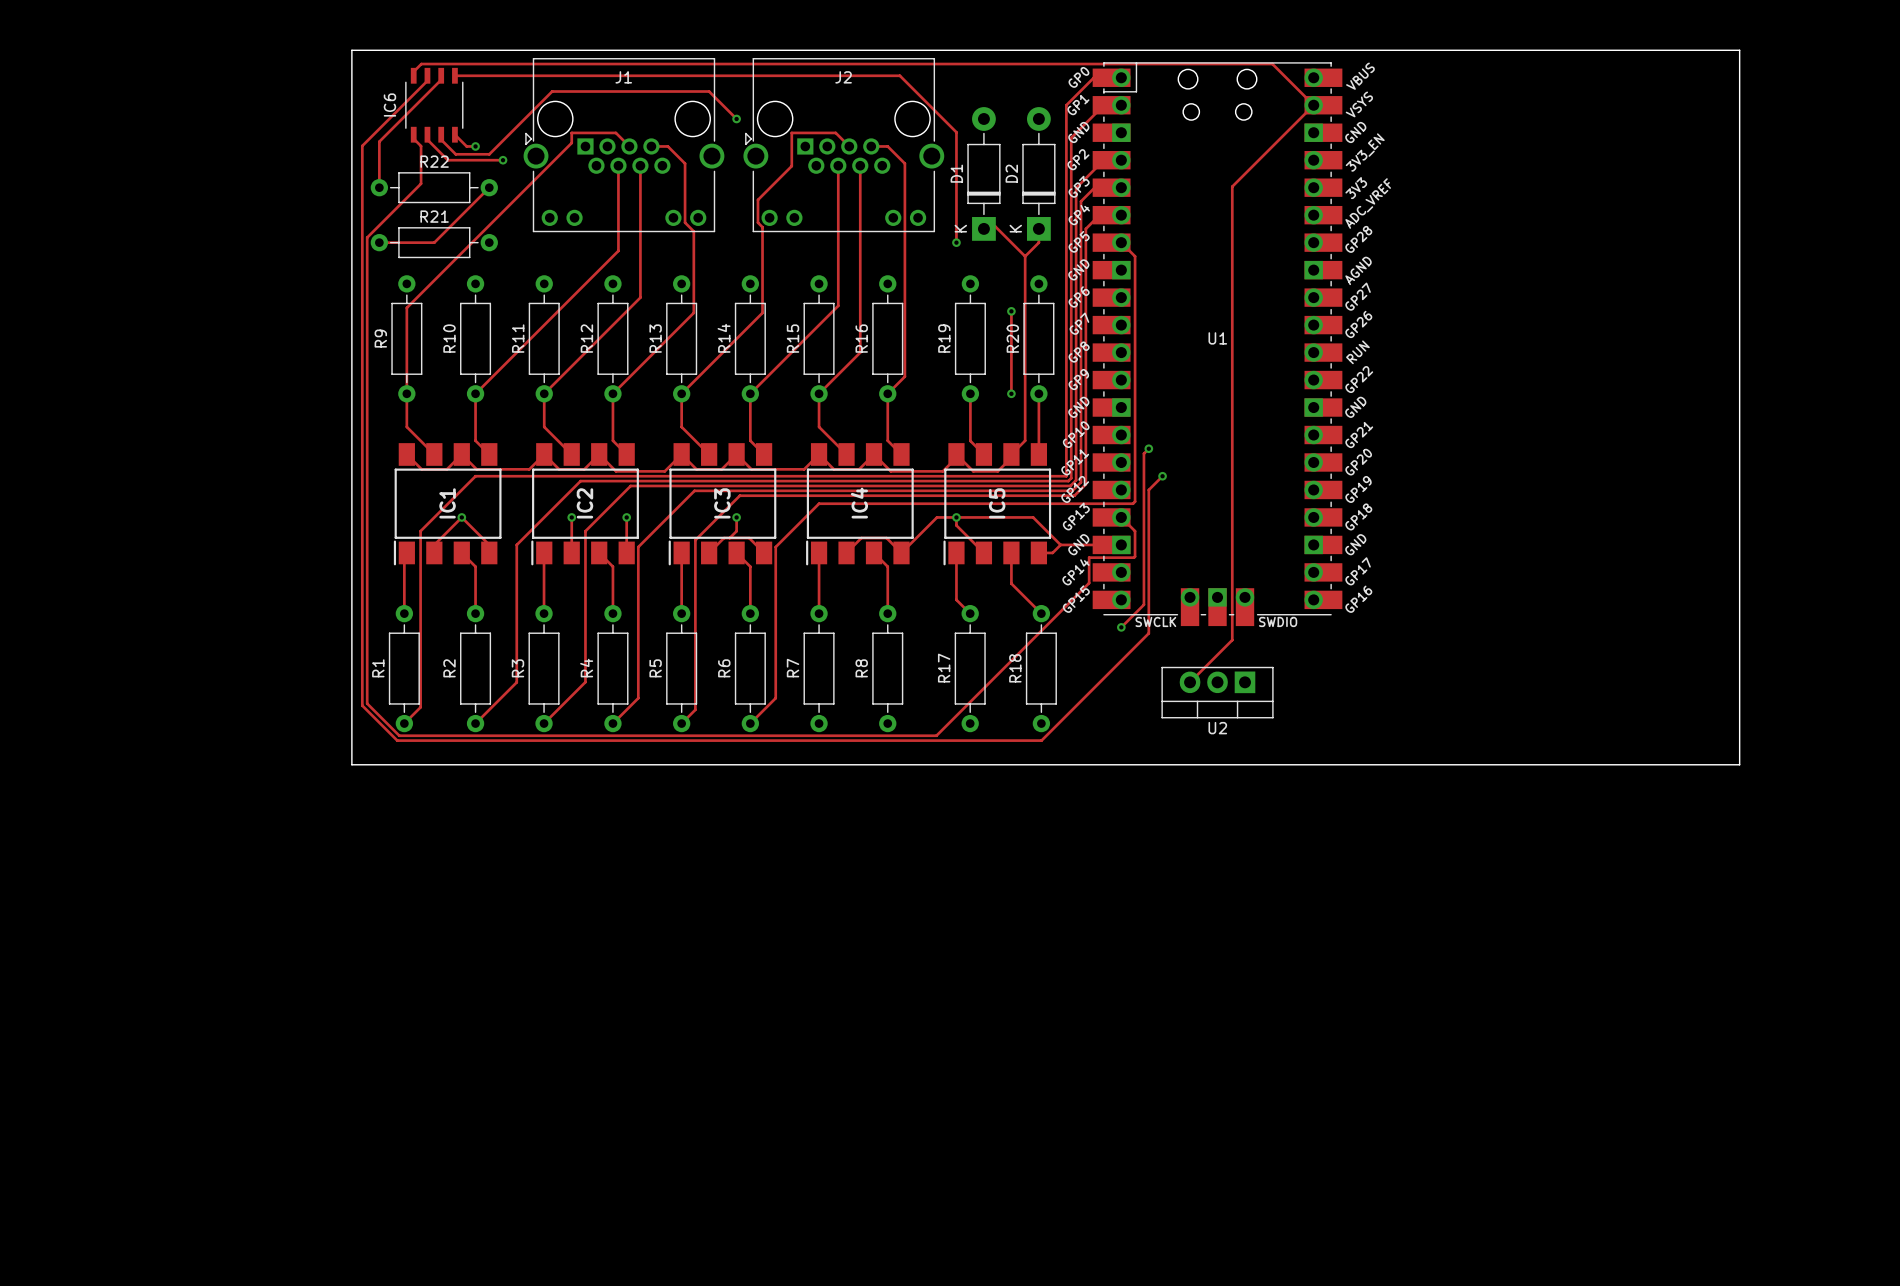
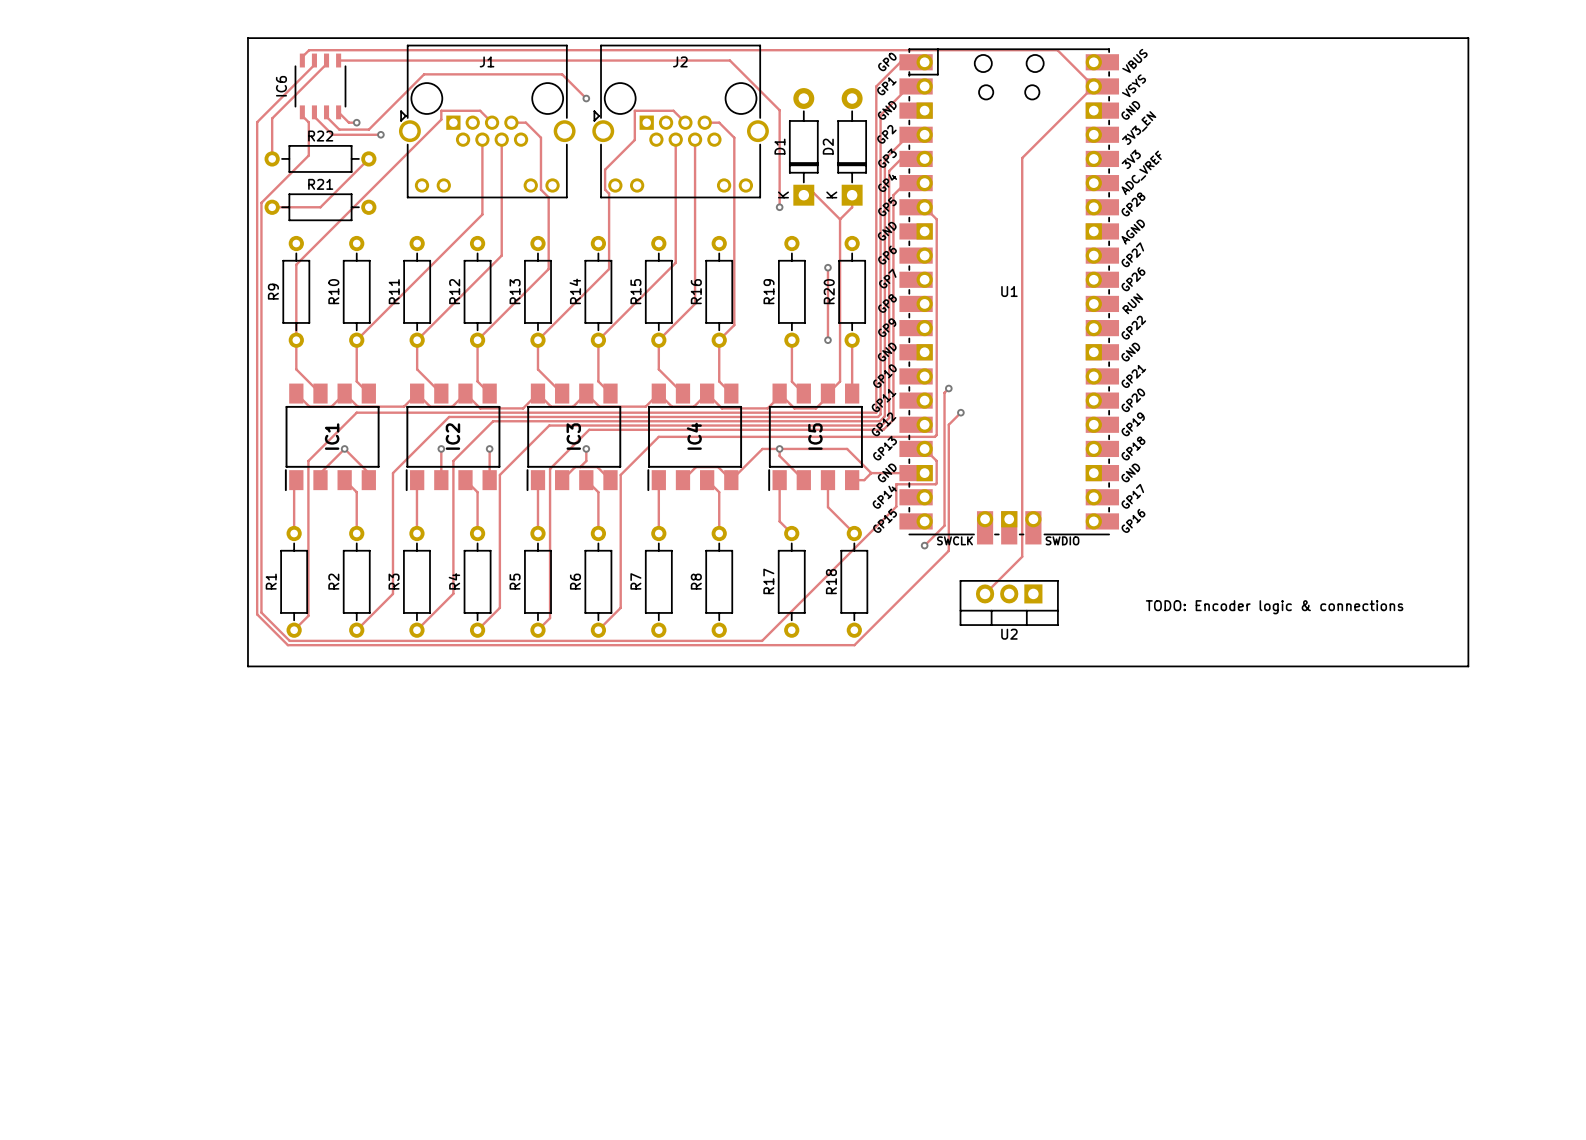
text: none -> TODO: Encoder logic & connections (1274, 607)

